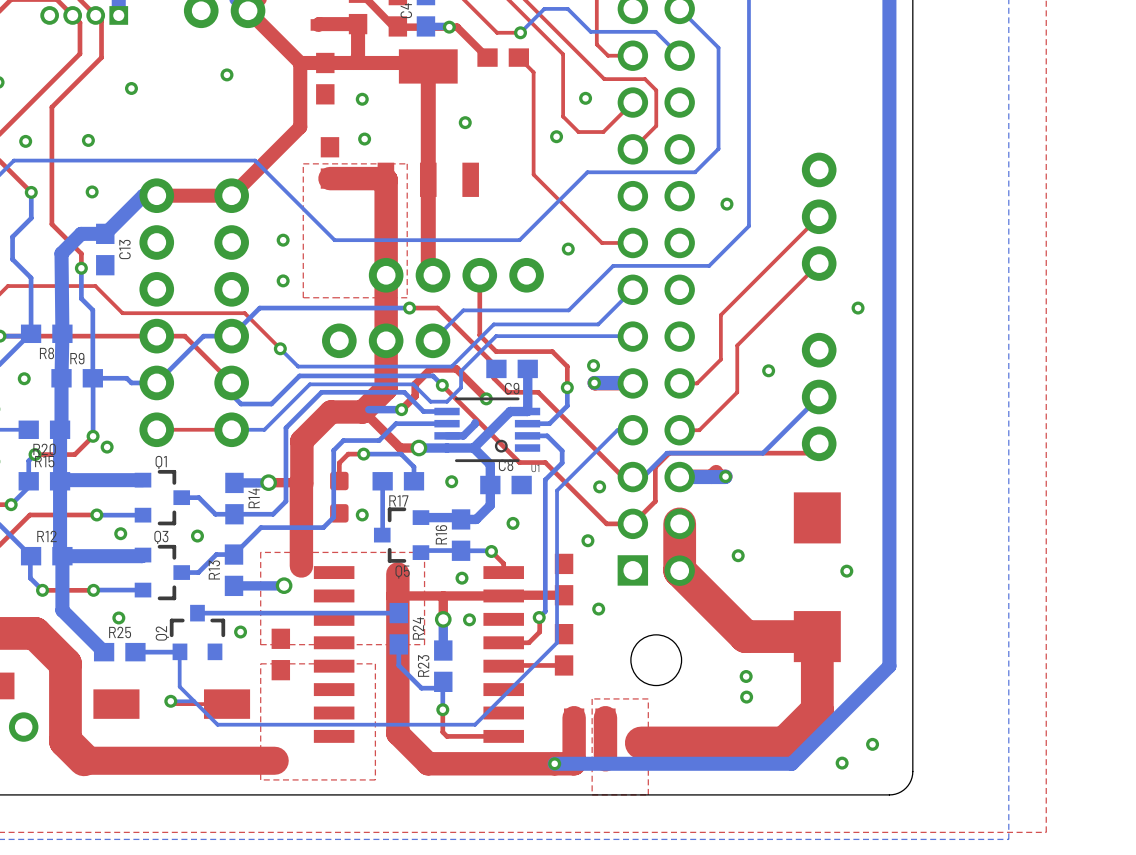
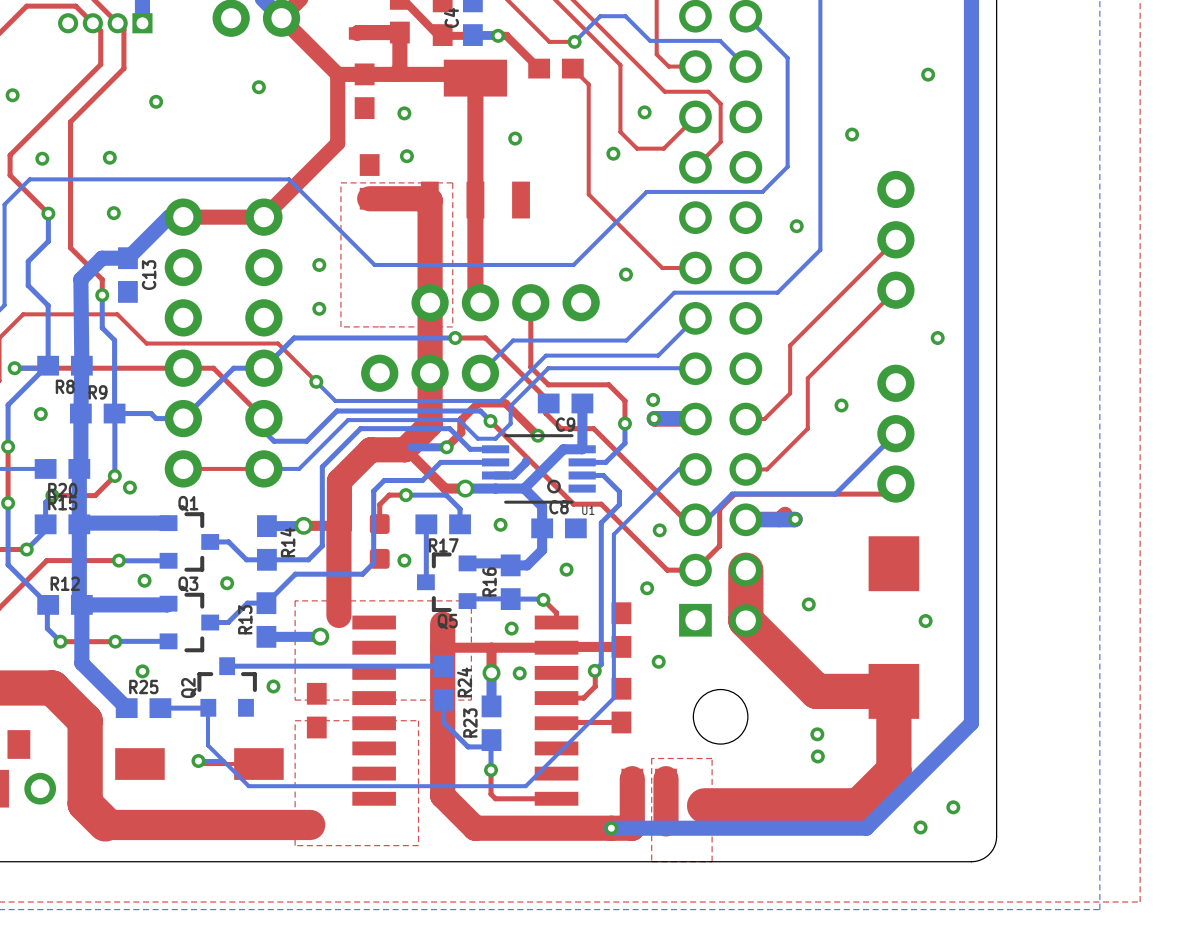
via: none -> (928, 74)
via: none -> (852, 134)

